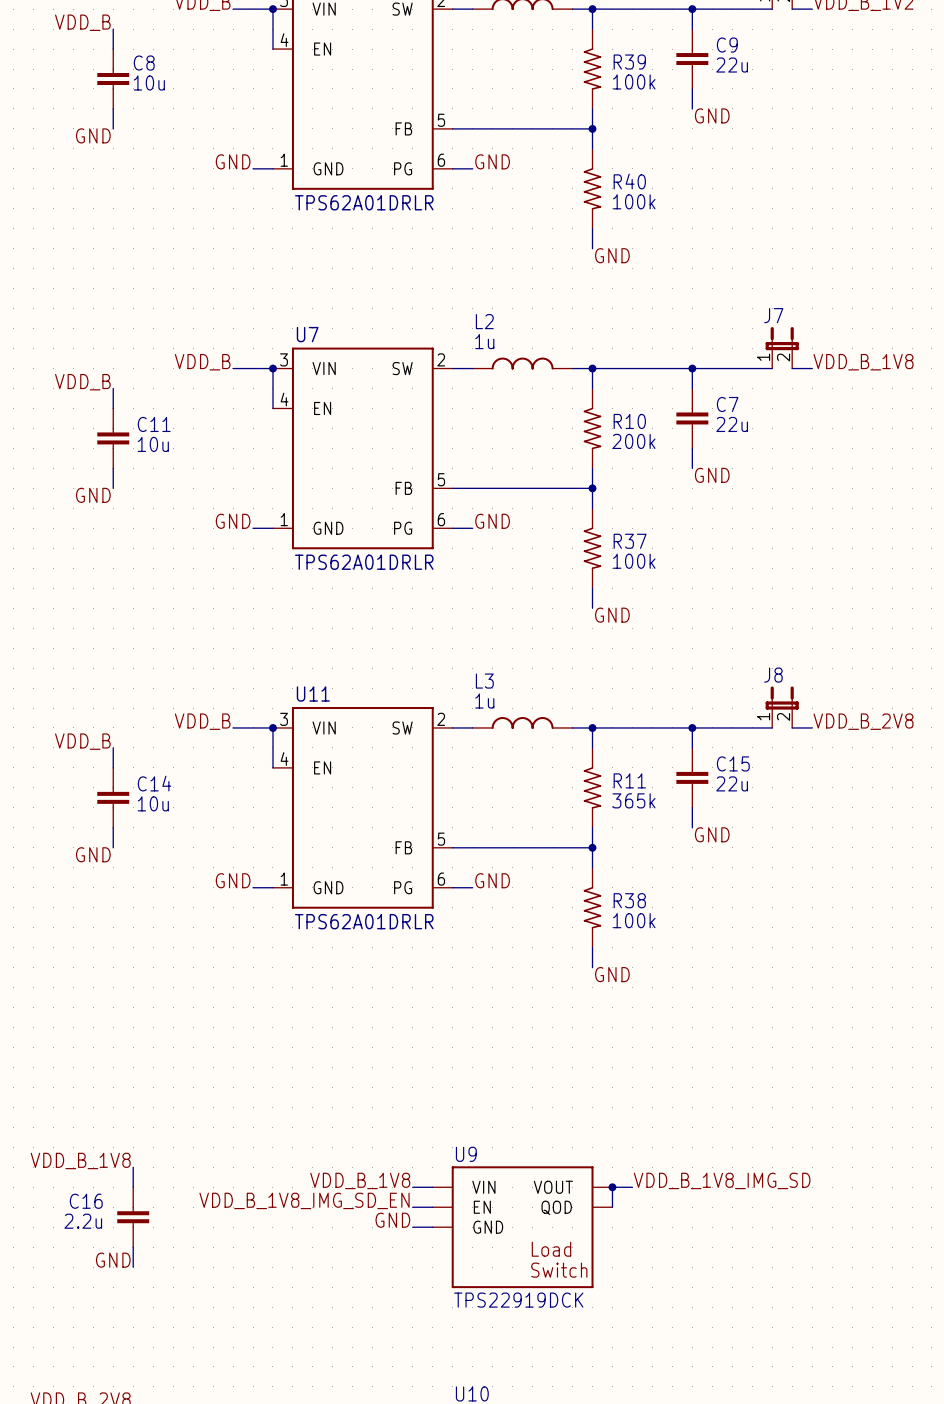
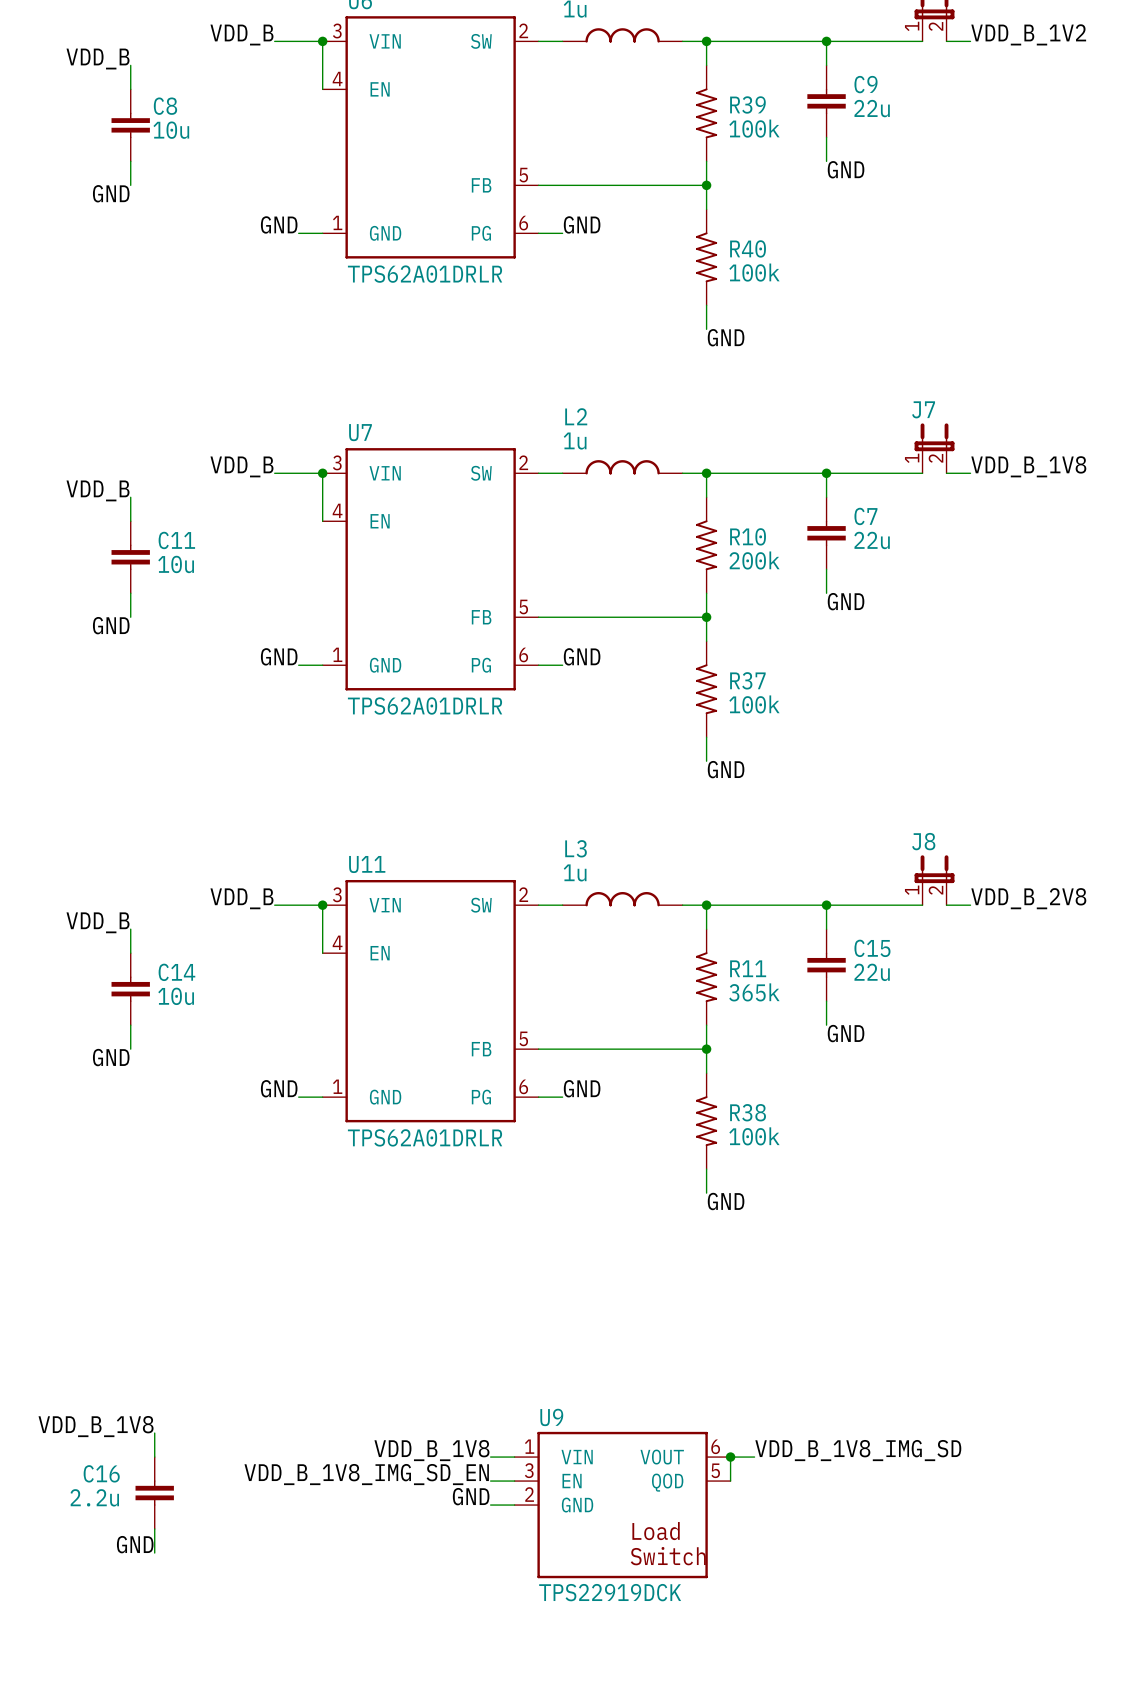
U9 pin number: none -> 1 (529, 1446)
U9 pin number: none -> 6 (715, 1446)
U9 pin number: none -> 3 (529, 1470)
U9 pin number: none -> 5 (715, 1470)
U9 pin number: none -> 2 (529, 1494)

